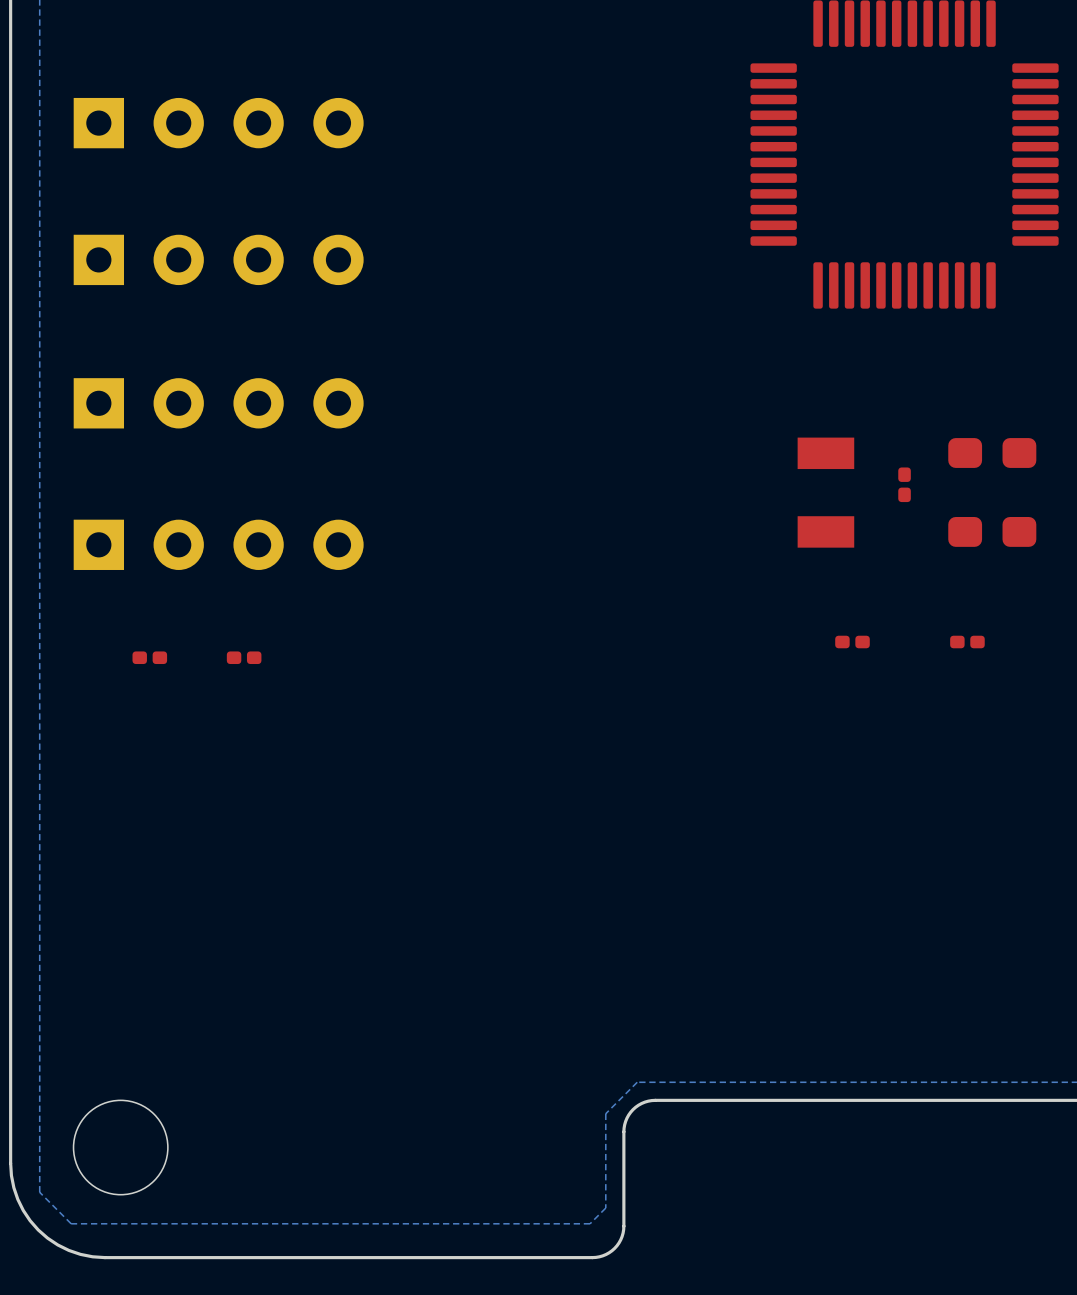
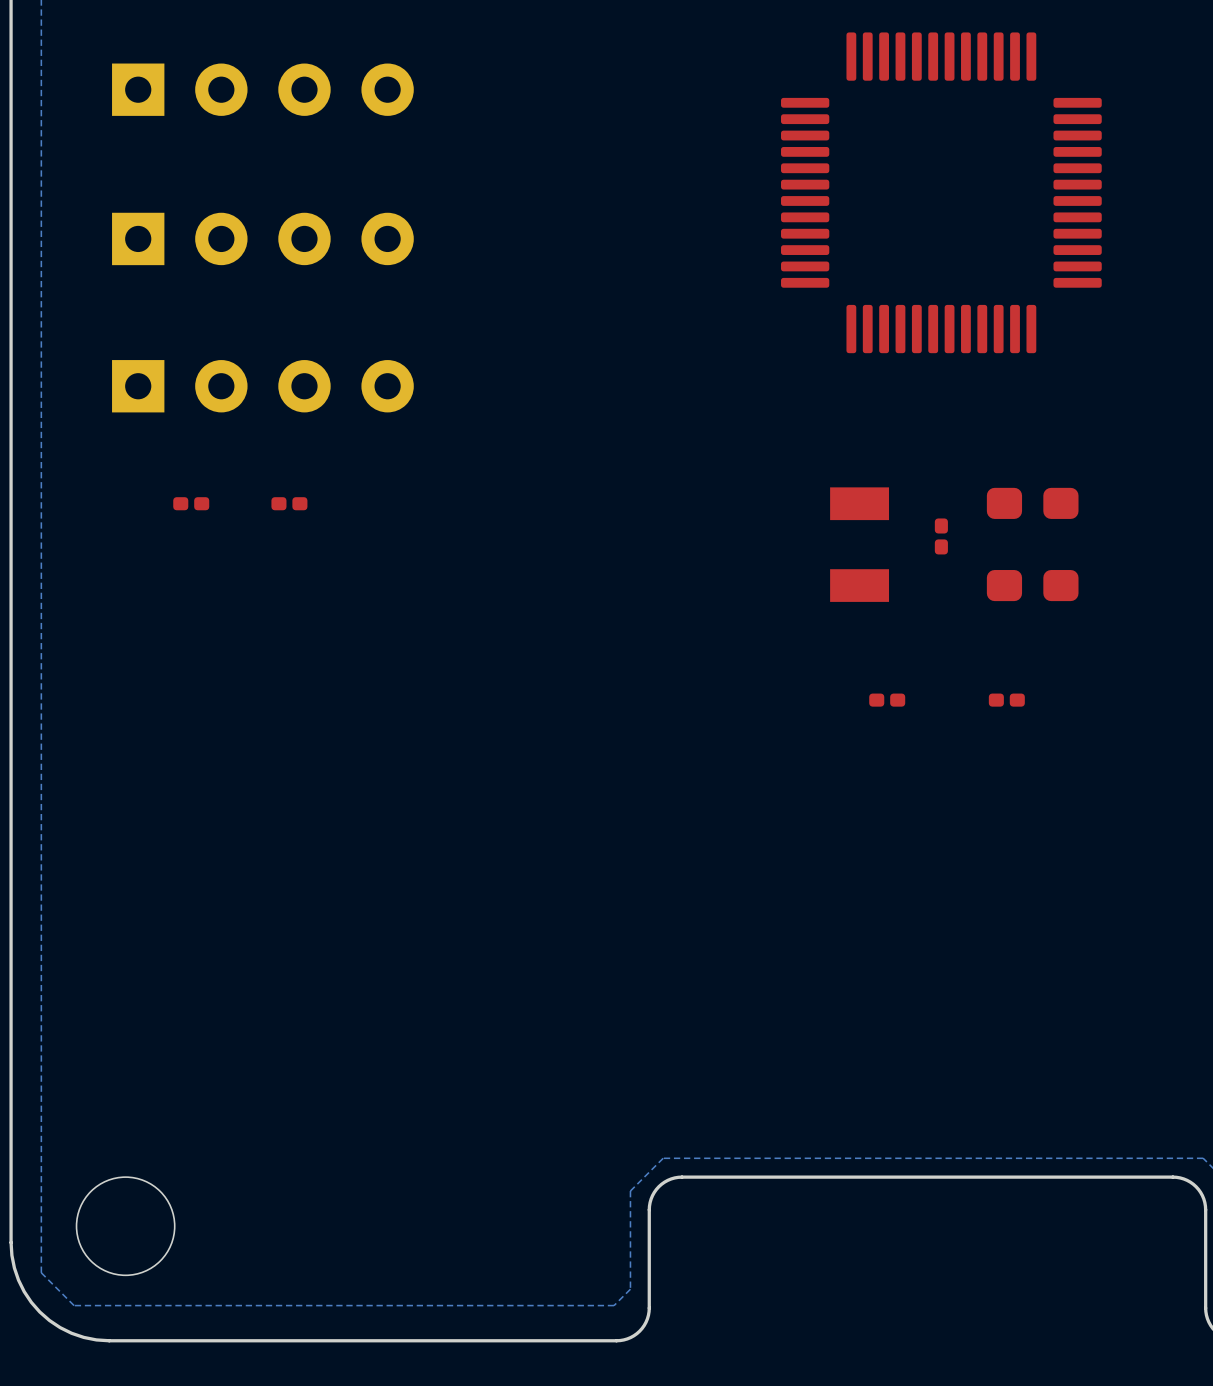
part: none -> (262, 89)
part: (218, 123) -> none
part: none -> (262, 238)
part: (218, 259) -> none
part: none -> (262, 386)
part: (218, 403) -> none
part: none -> (191, 503)
part: none -> (289, 503)
part: (218, 544) -> none
part: (149, 657) -> none
part: (244, 657) -> none

